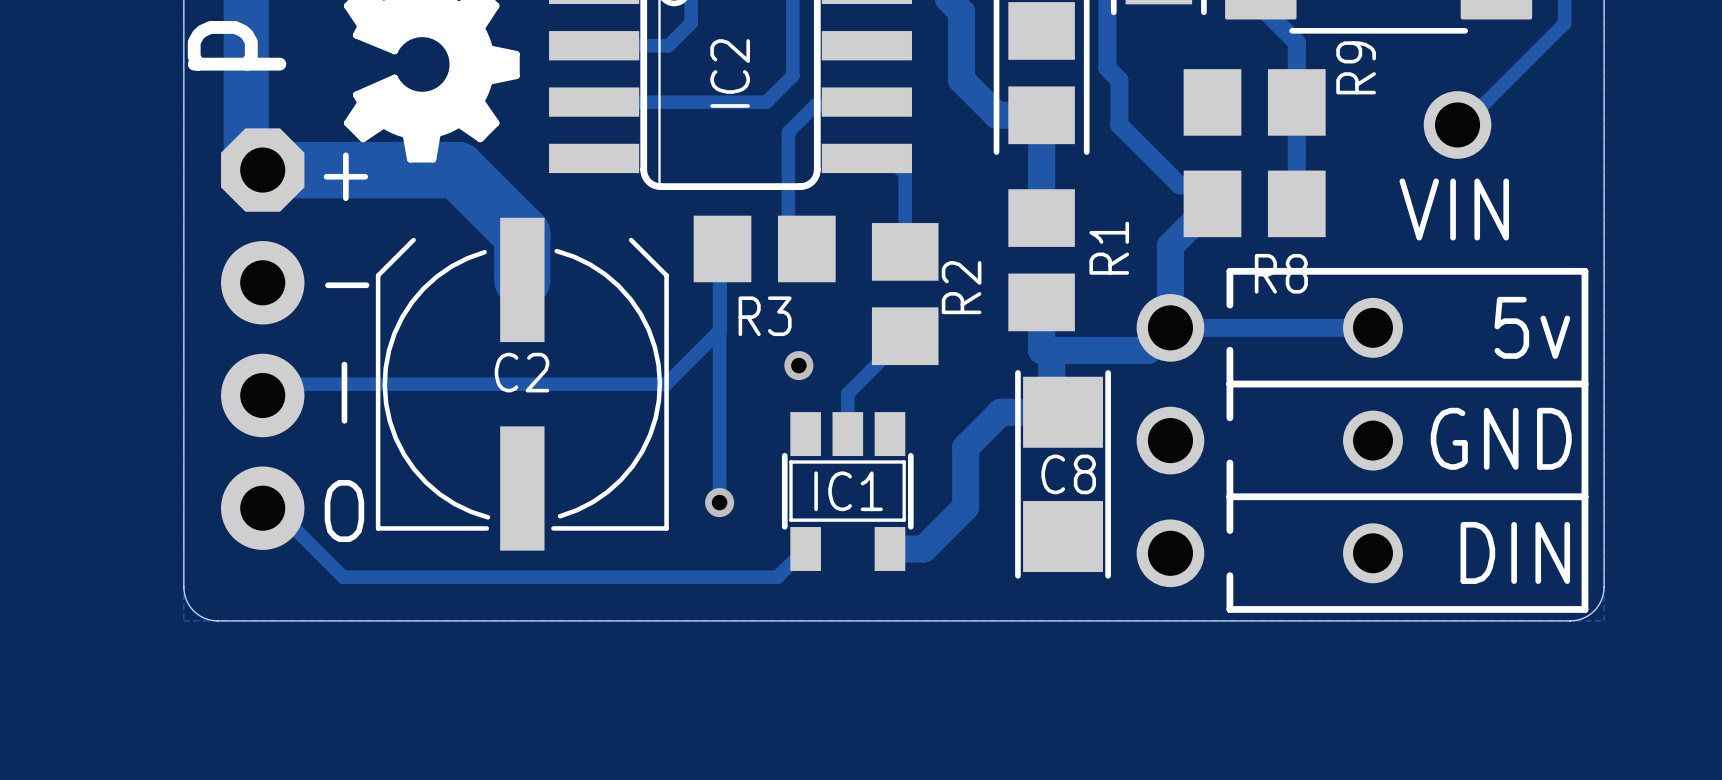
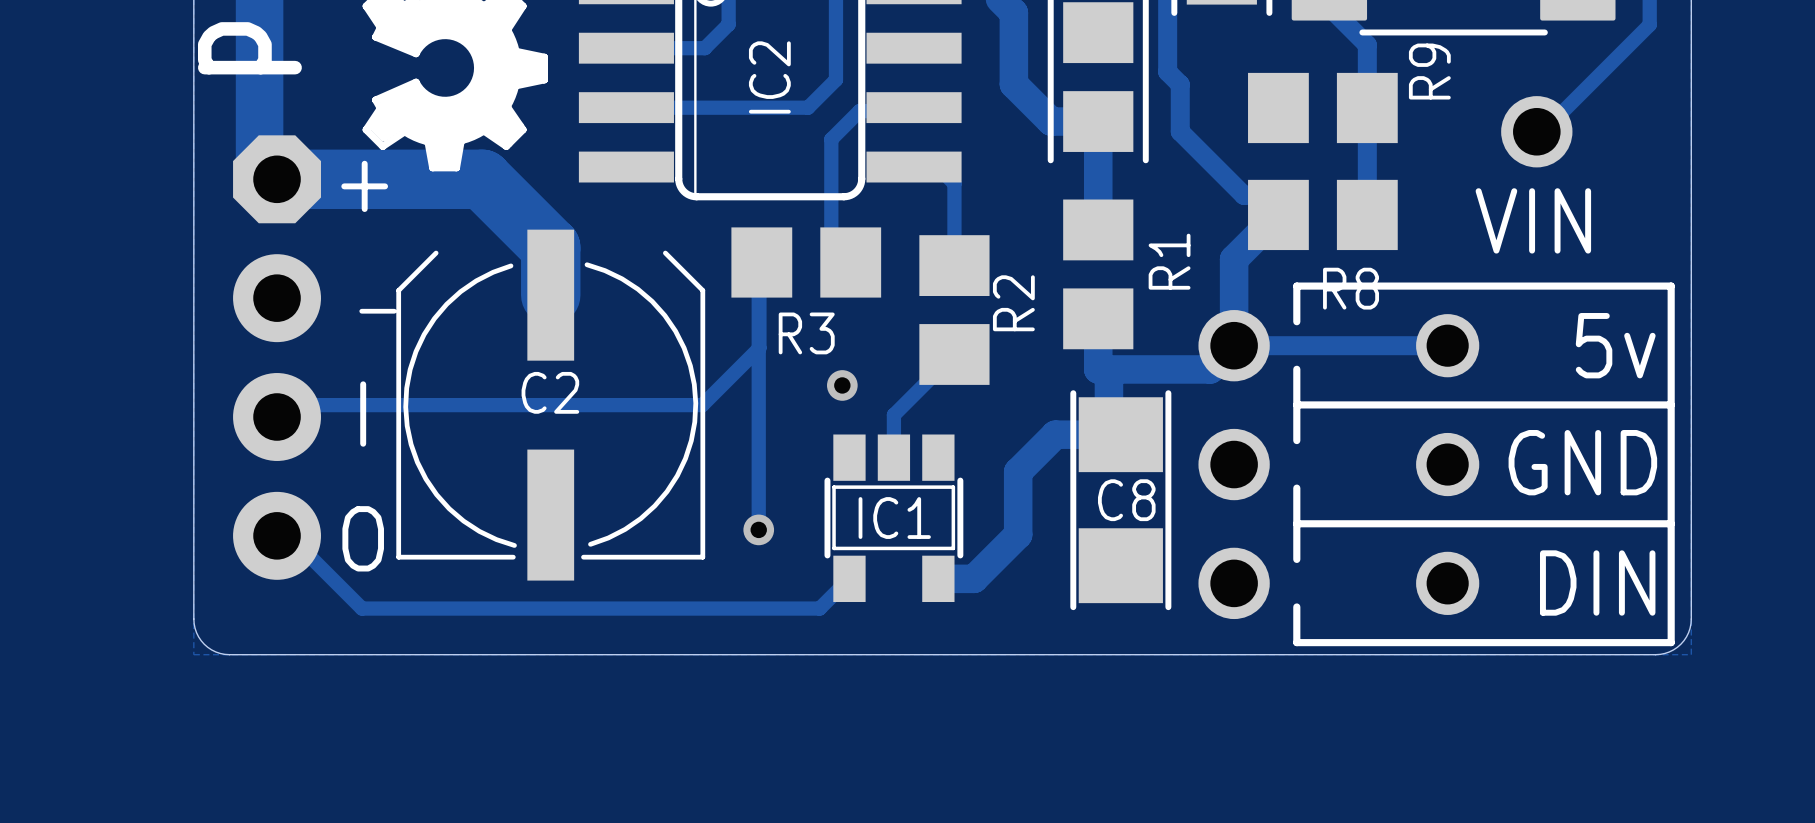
text position: - (347, 285) -> - (378, 311)

